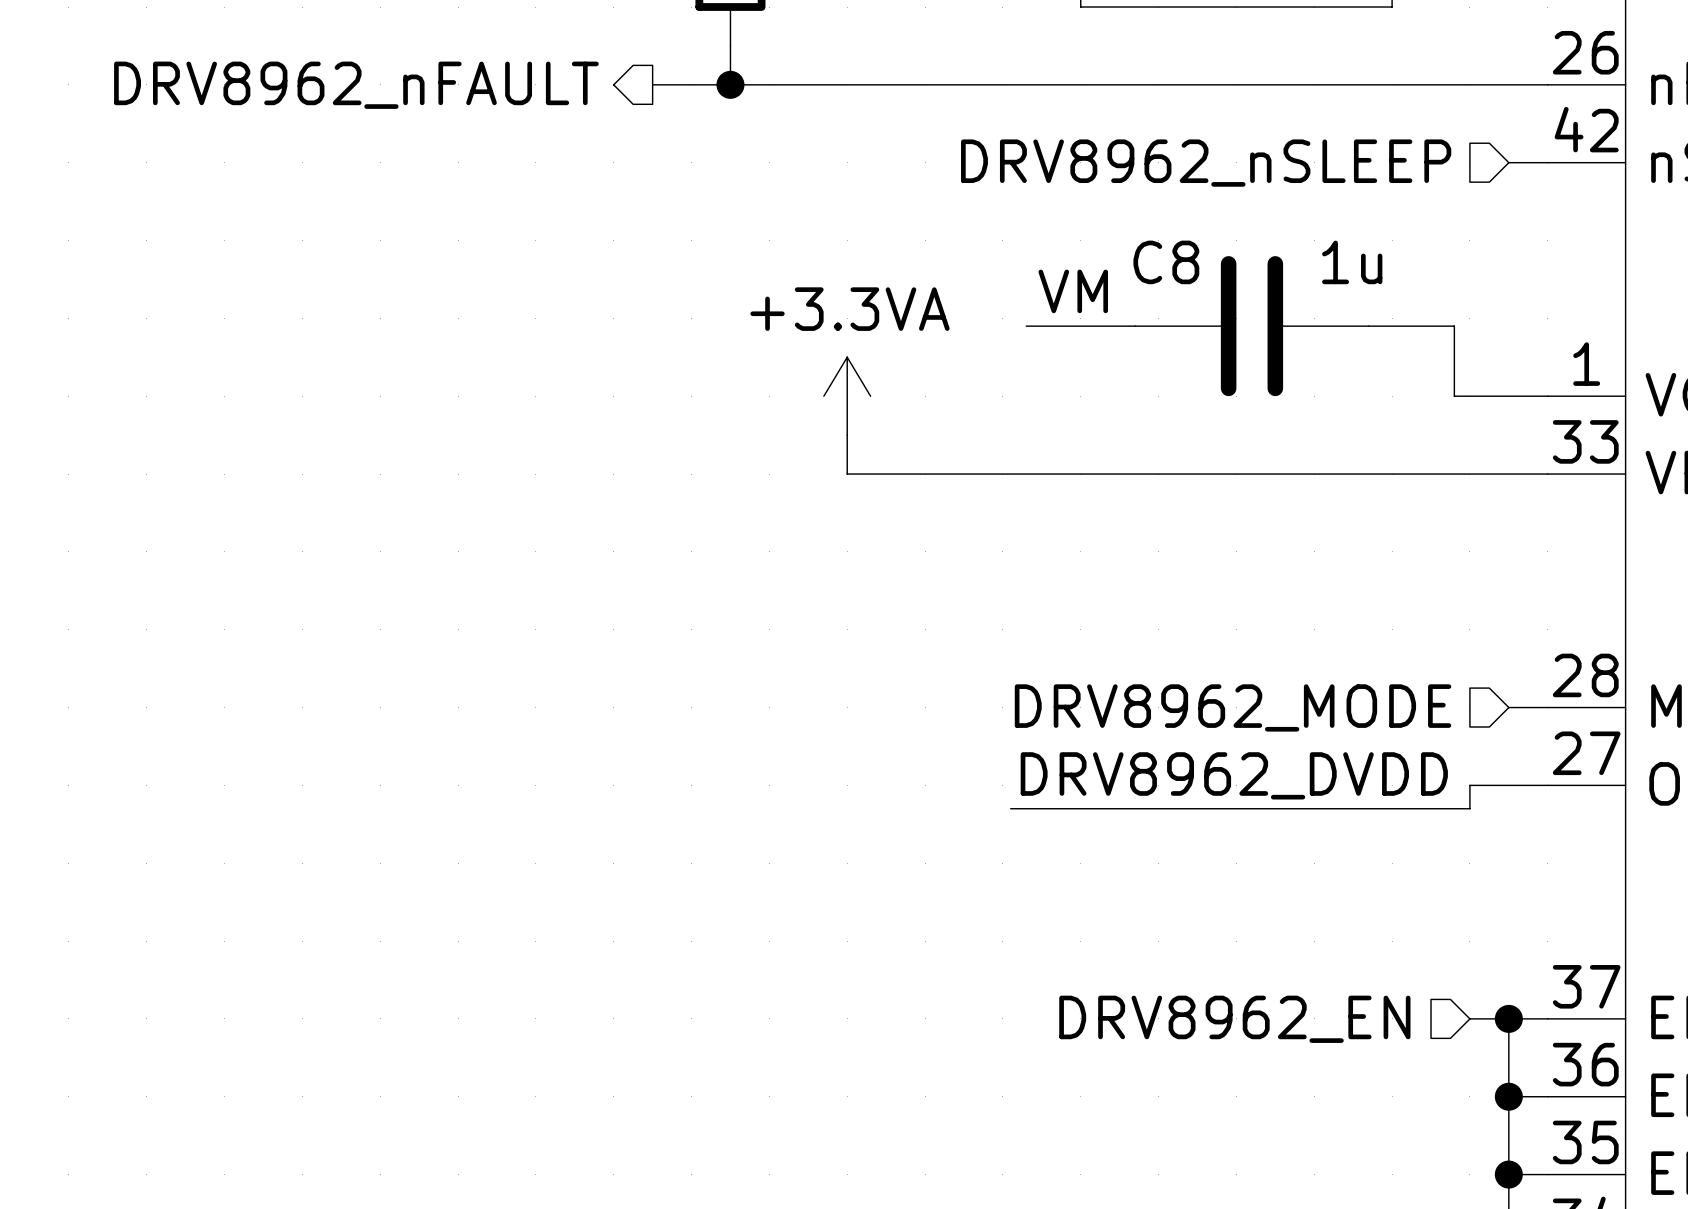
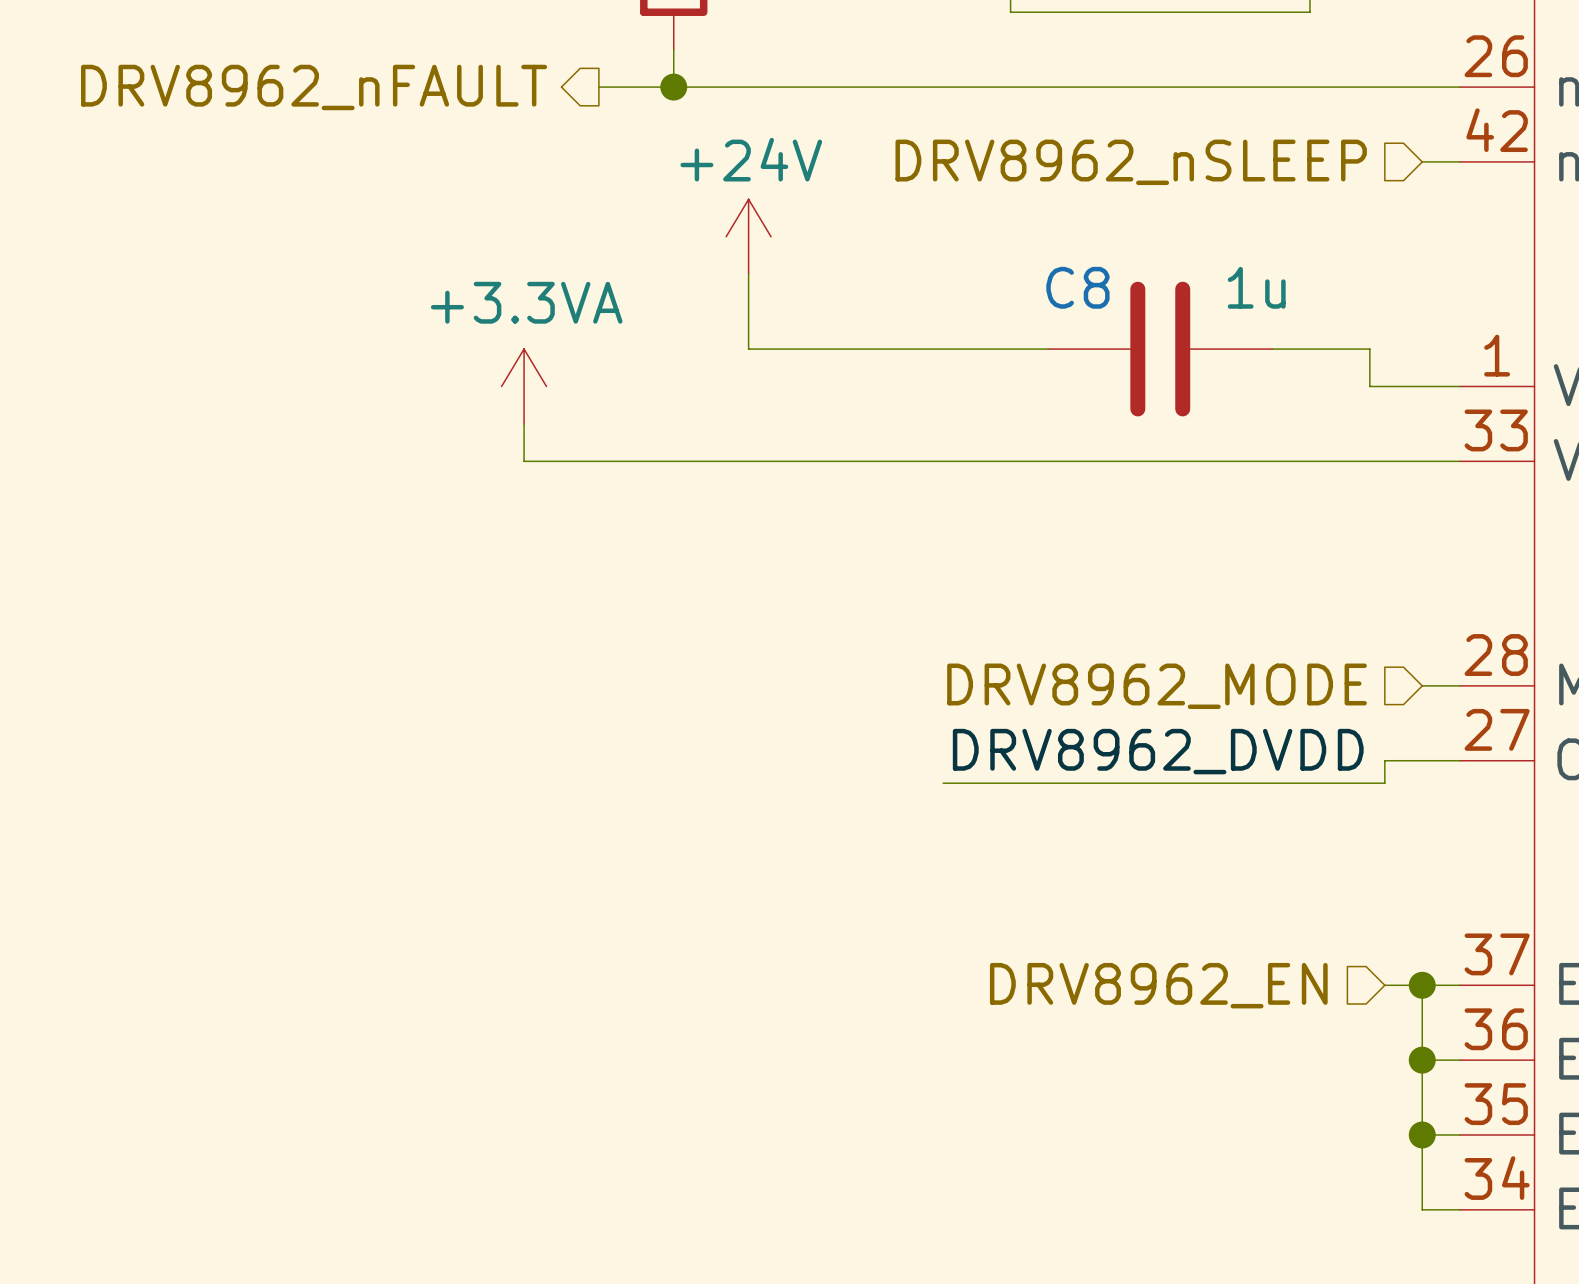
power symbol: none -> +24V (748, 236)
wire: none -> (748, 274) (748, 349) (1048, 349)
label: VM (1073, 291) -> none
wire: (1026, 326) (1135, 326) -> none
C8 position: (1251, 326) -> (1160, 349)
wire: (1368, 326) (1454, 326) (1454, 357) -> (1272, 349) (1369, 349)
power symbol position: +3.3VA (847, 396) -> +3.3VA (524, 386)
wire: (847, 435) (847, 474) -> (524, 423) (524, 461) (786, 461)

